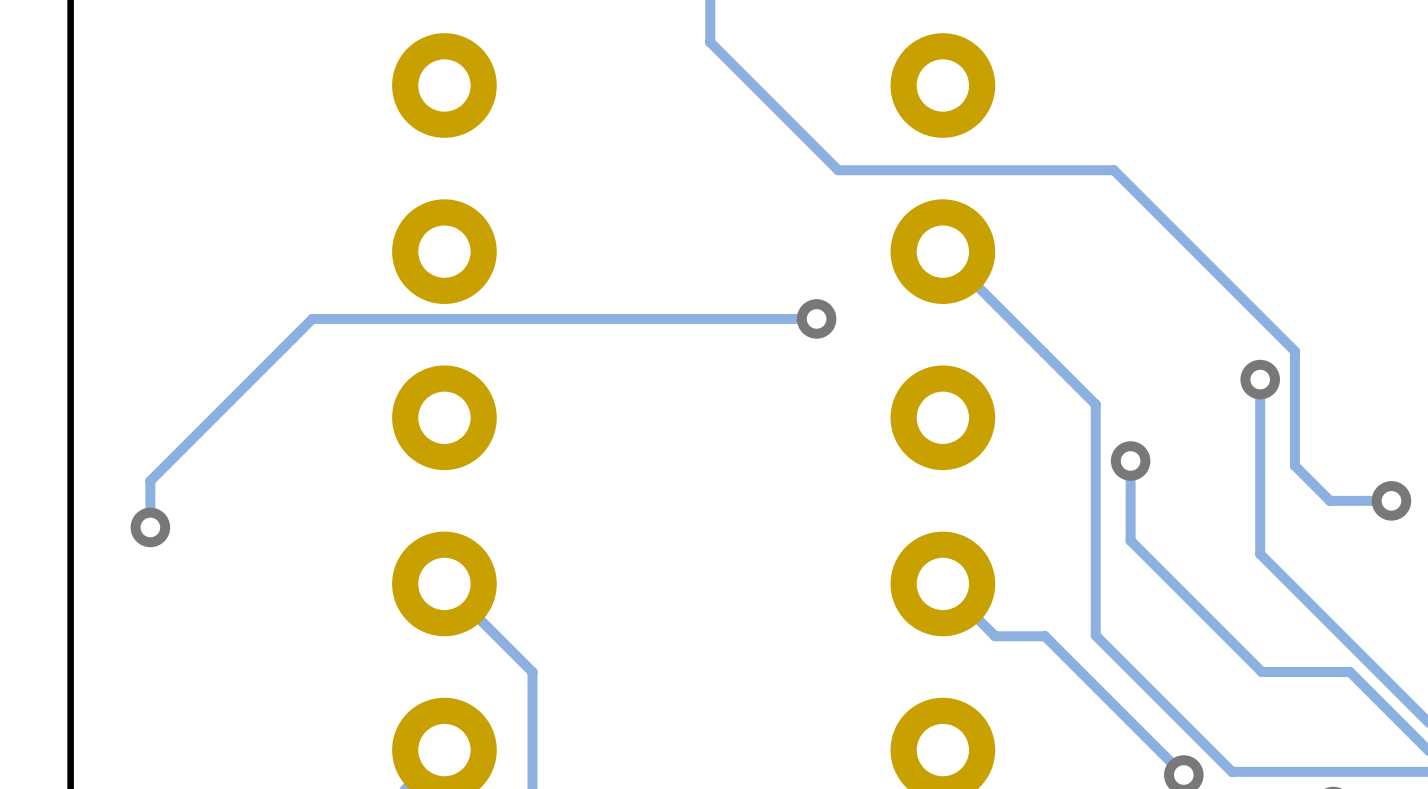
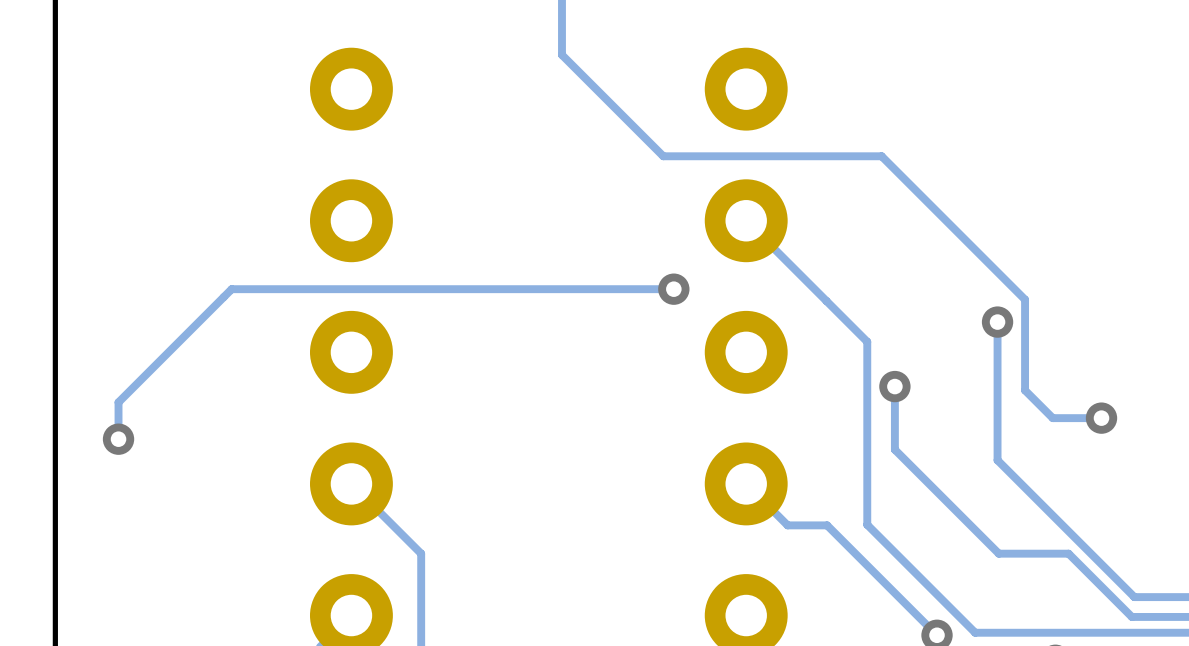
track: (816, 318) (312, 318) (293, 338) -> (673, 289) (231, 289)
via position: (816, 318) -> (673, 289)

